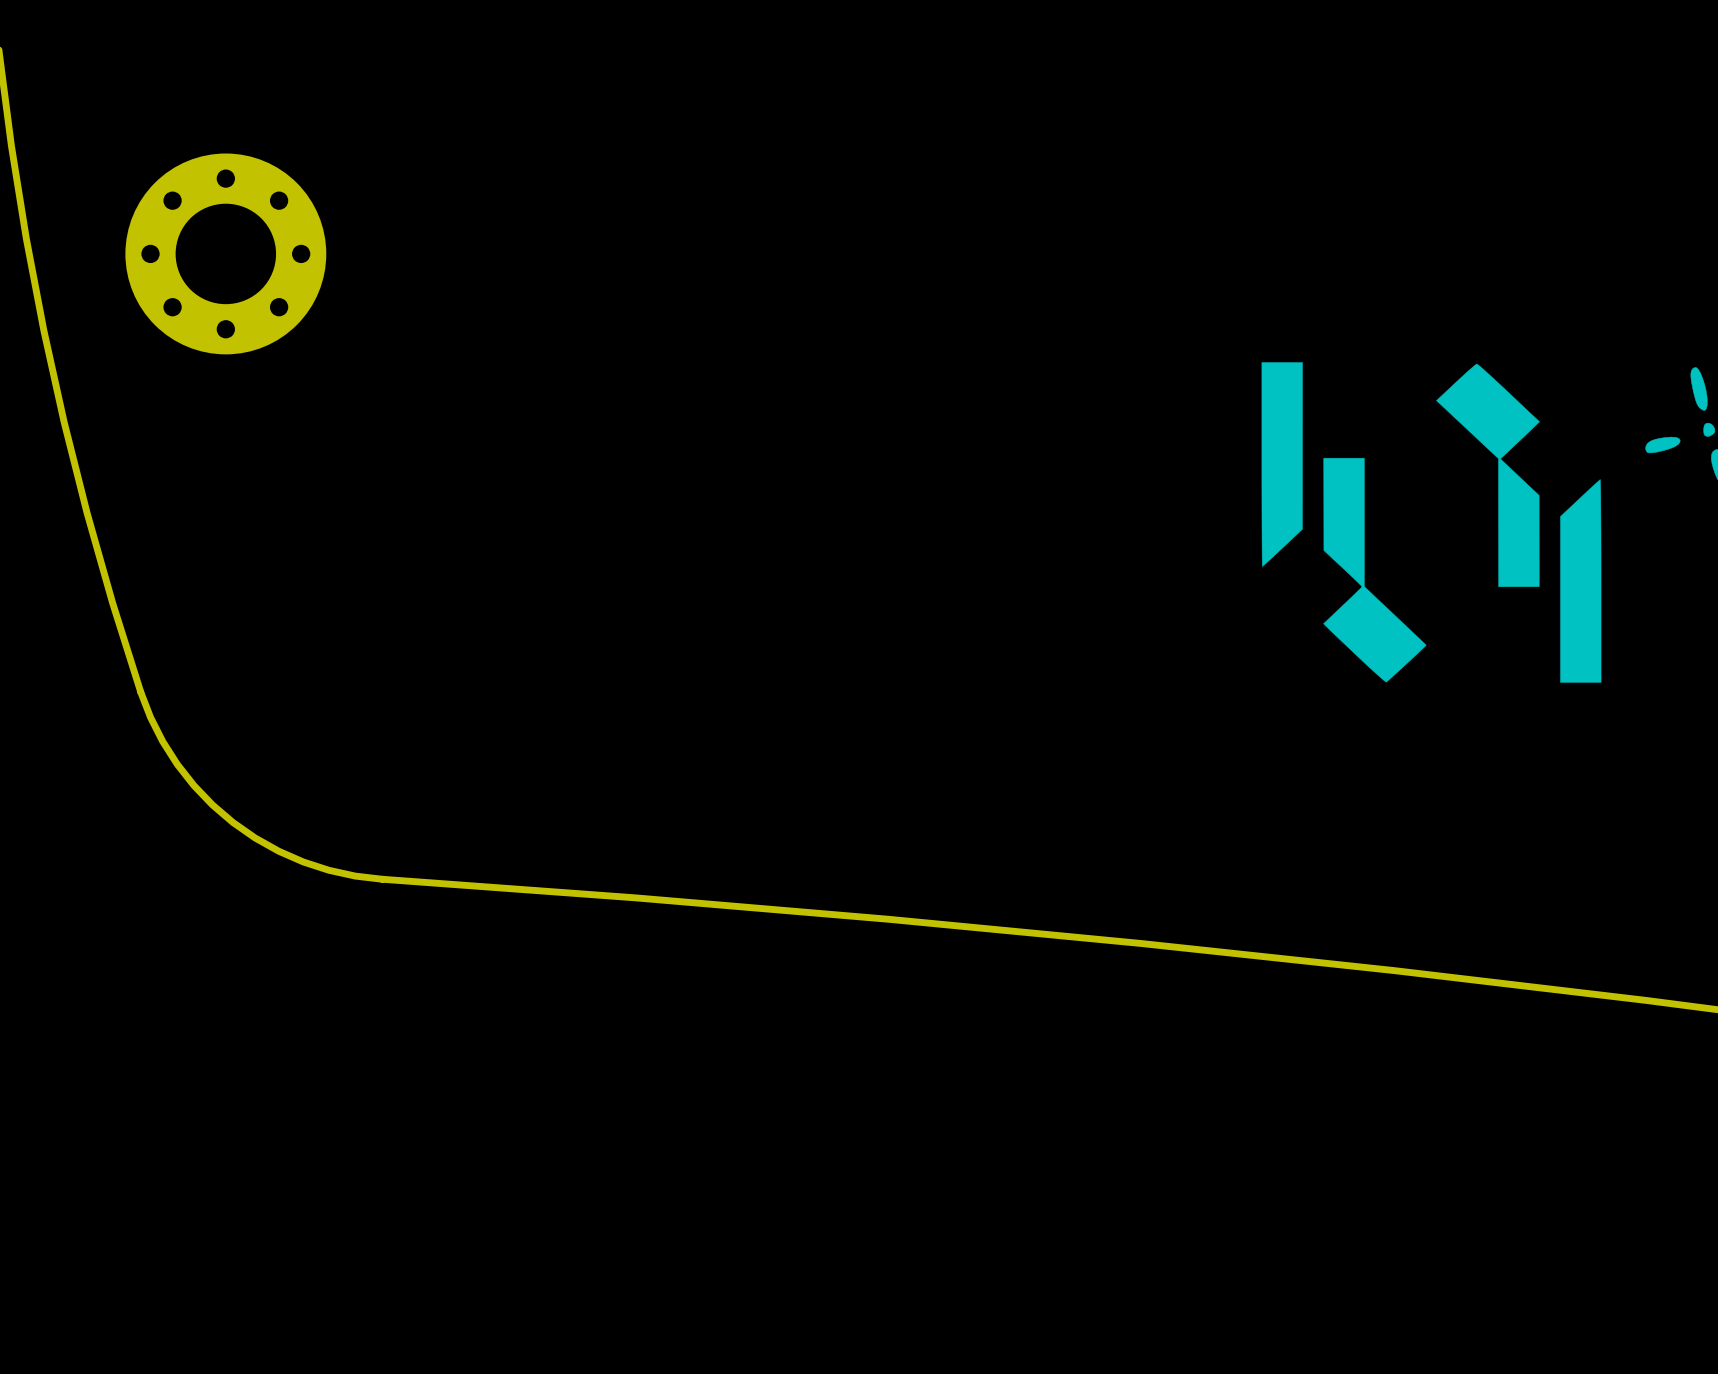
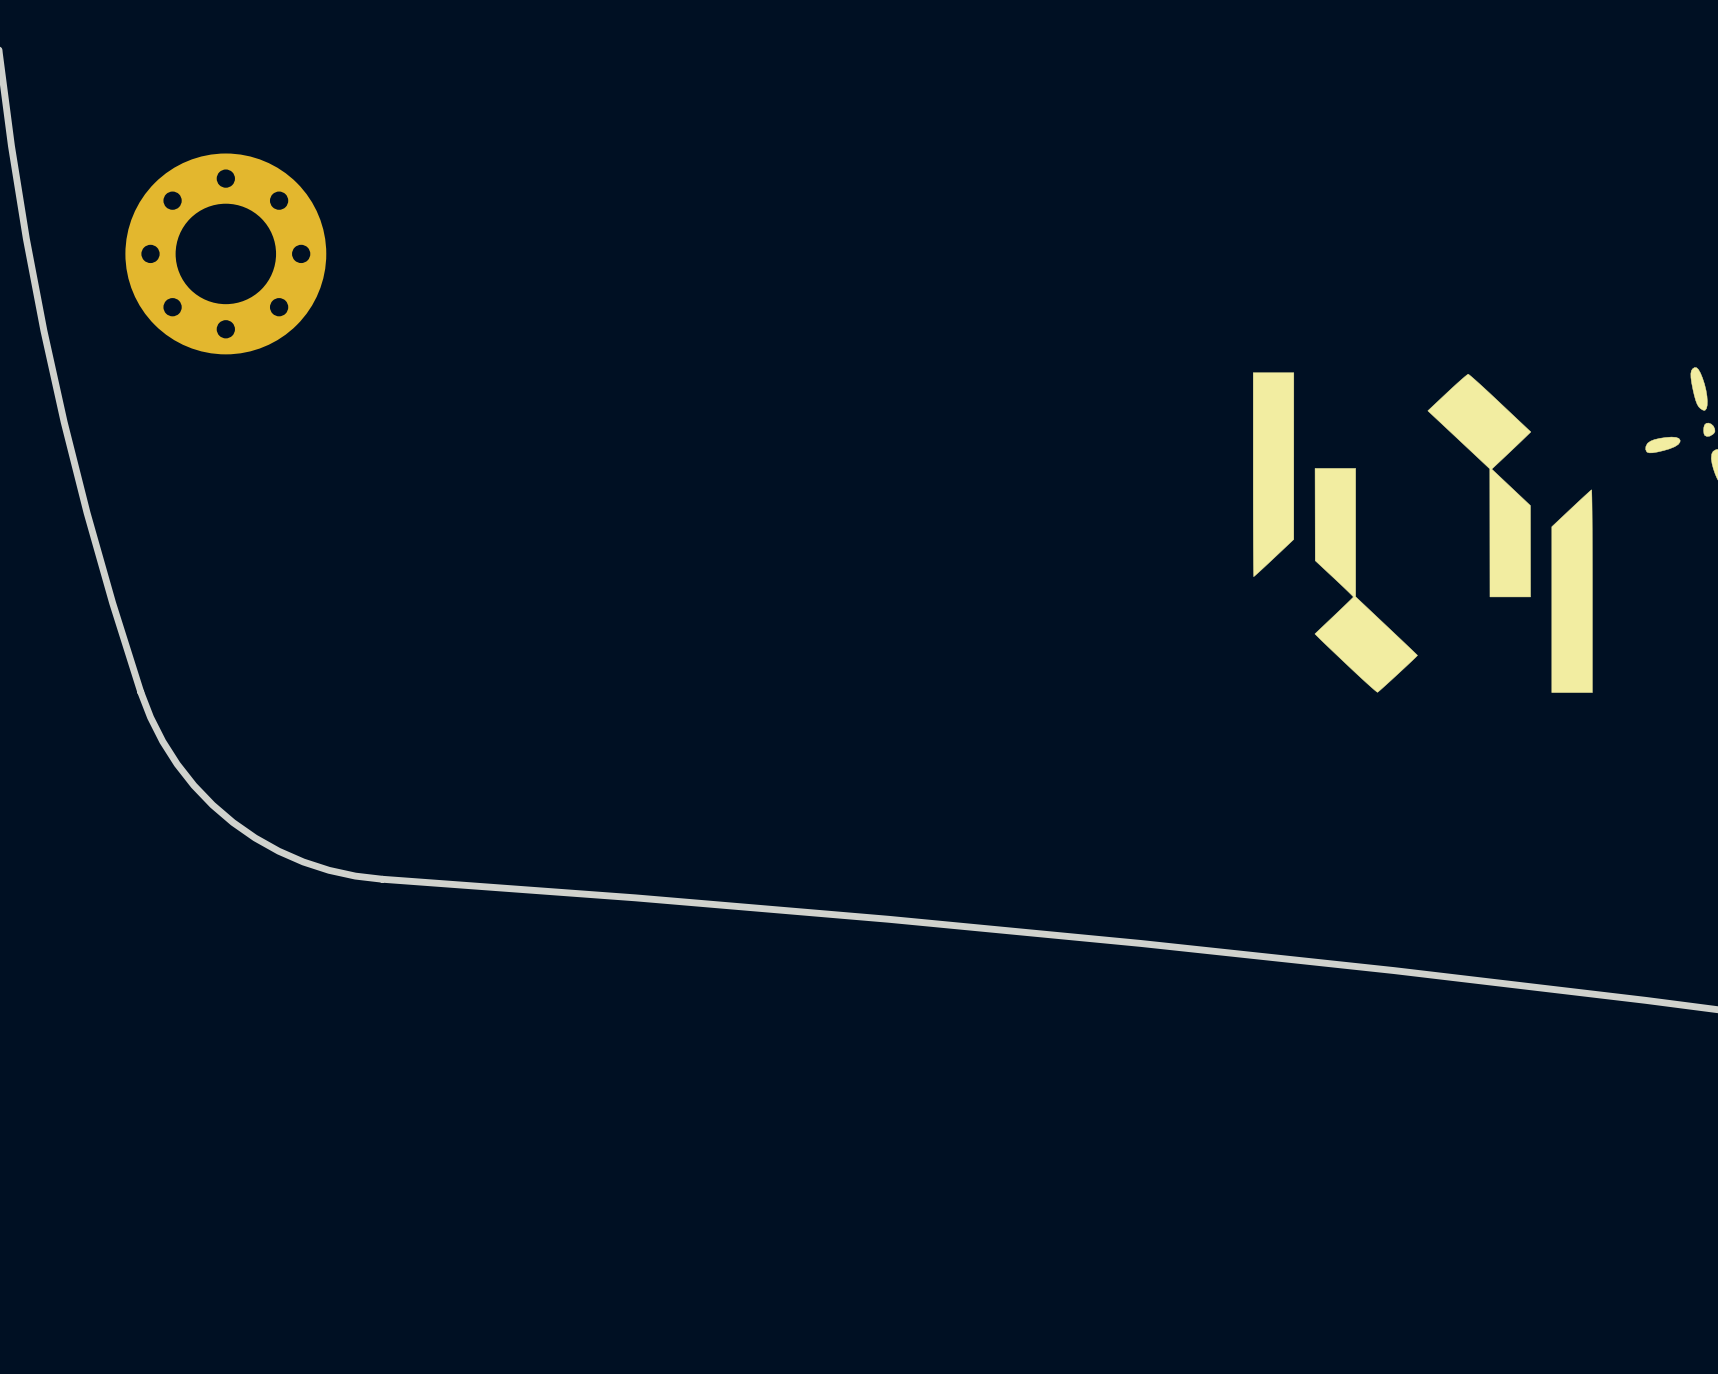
drawing position: (1431, 522) -> (1422, 532)

